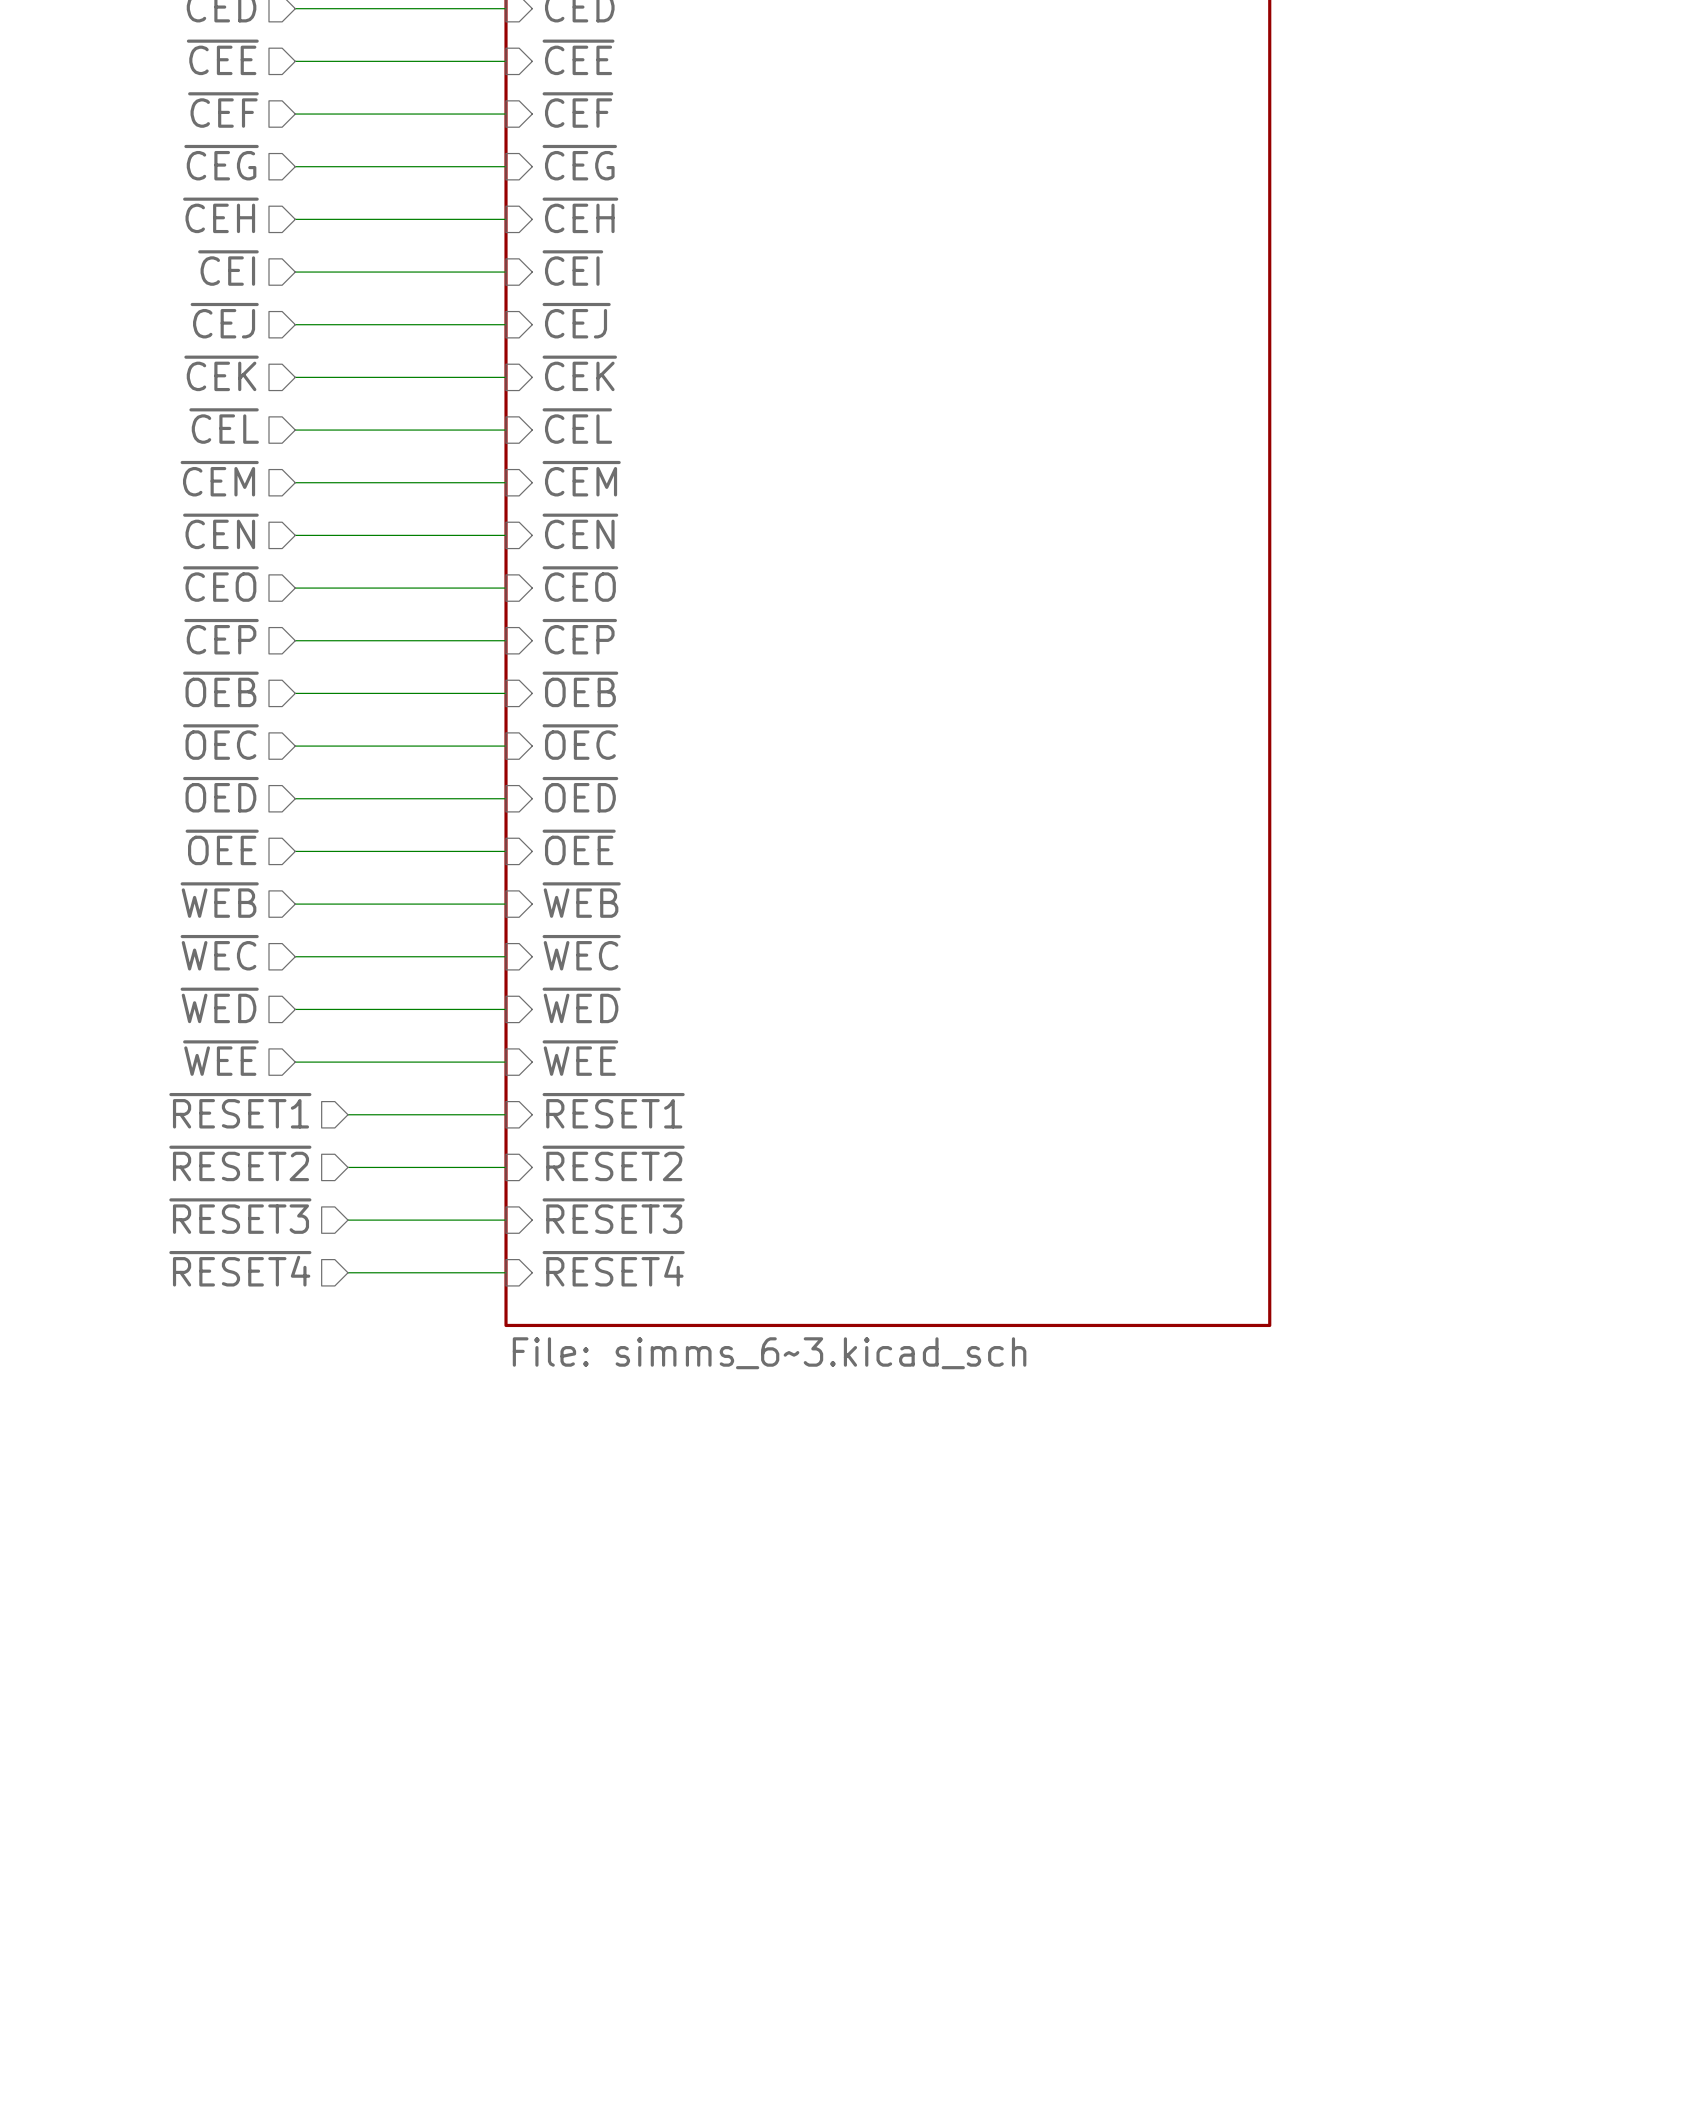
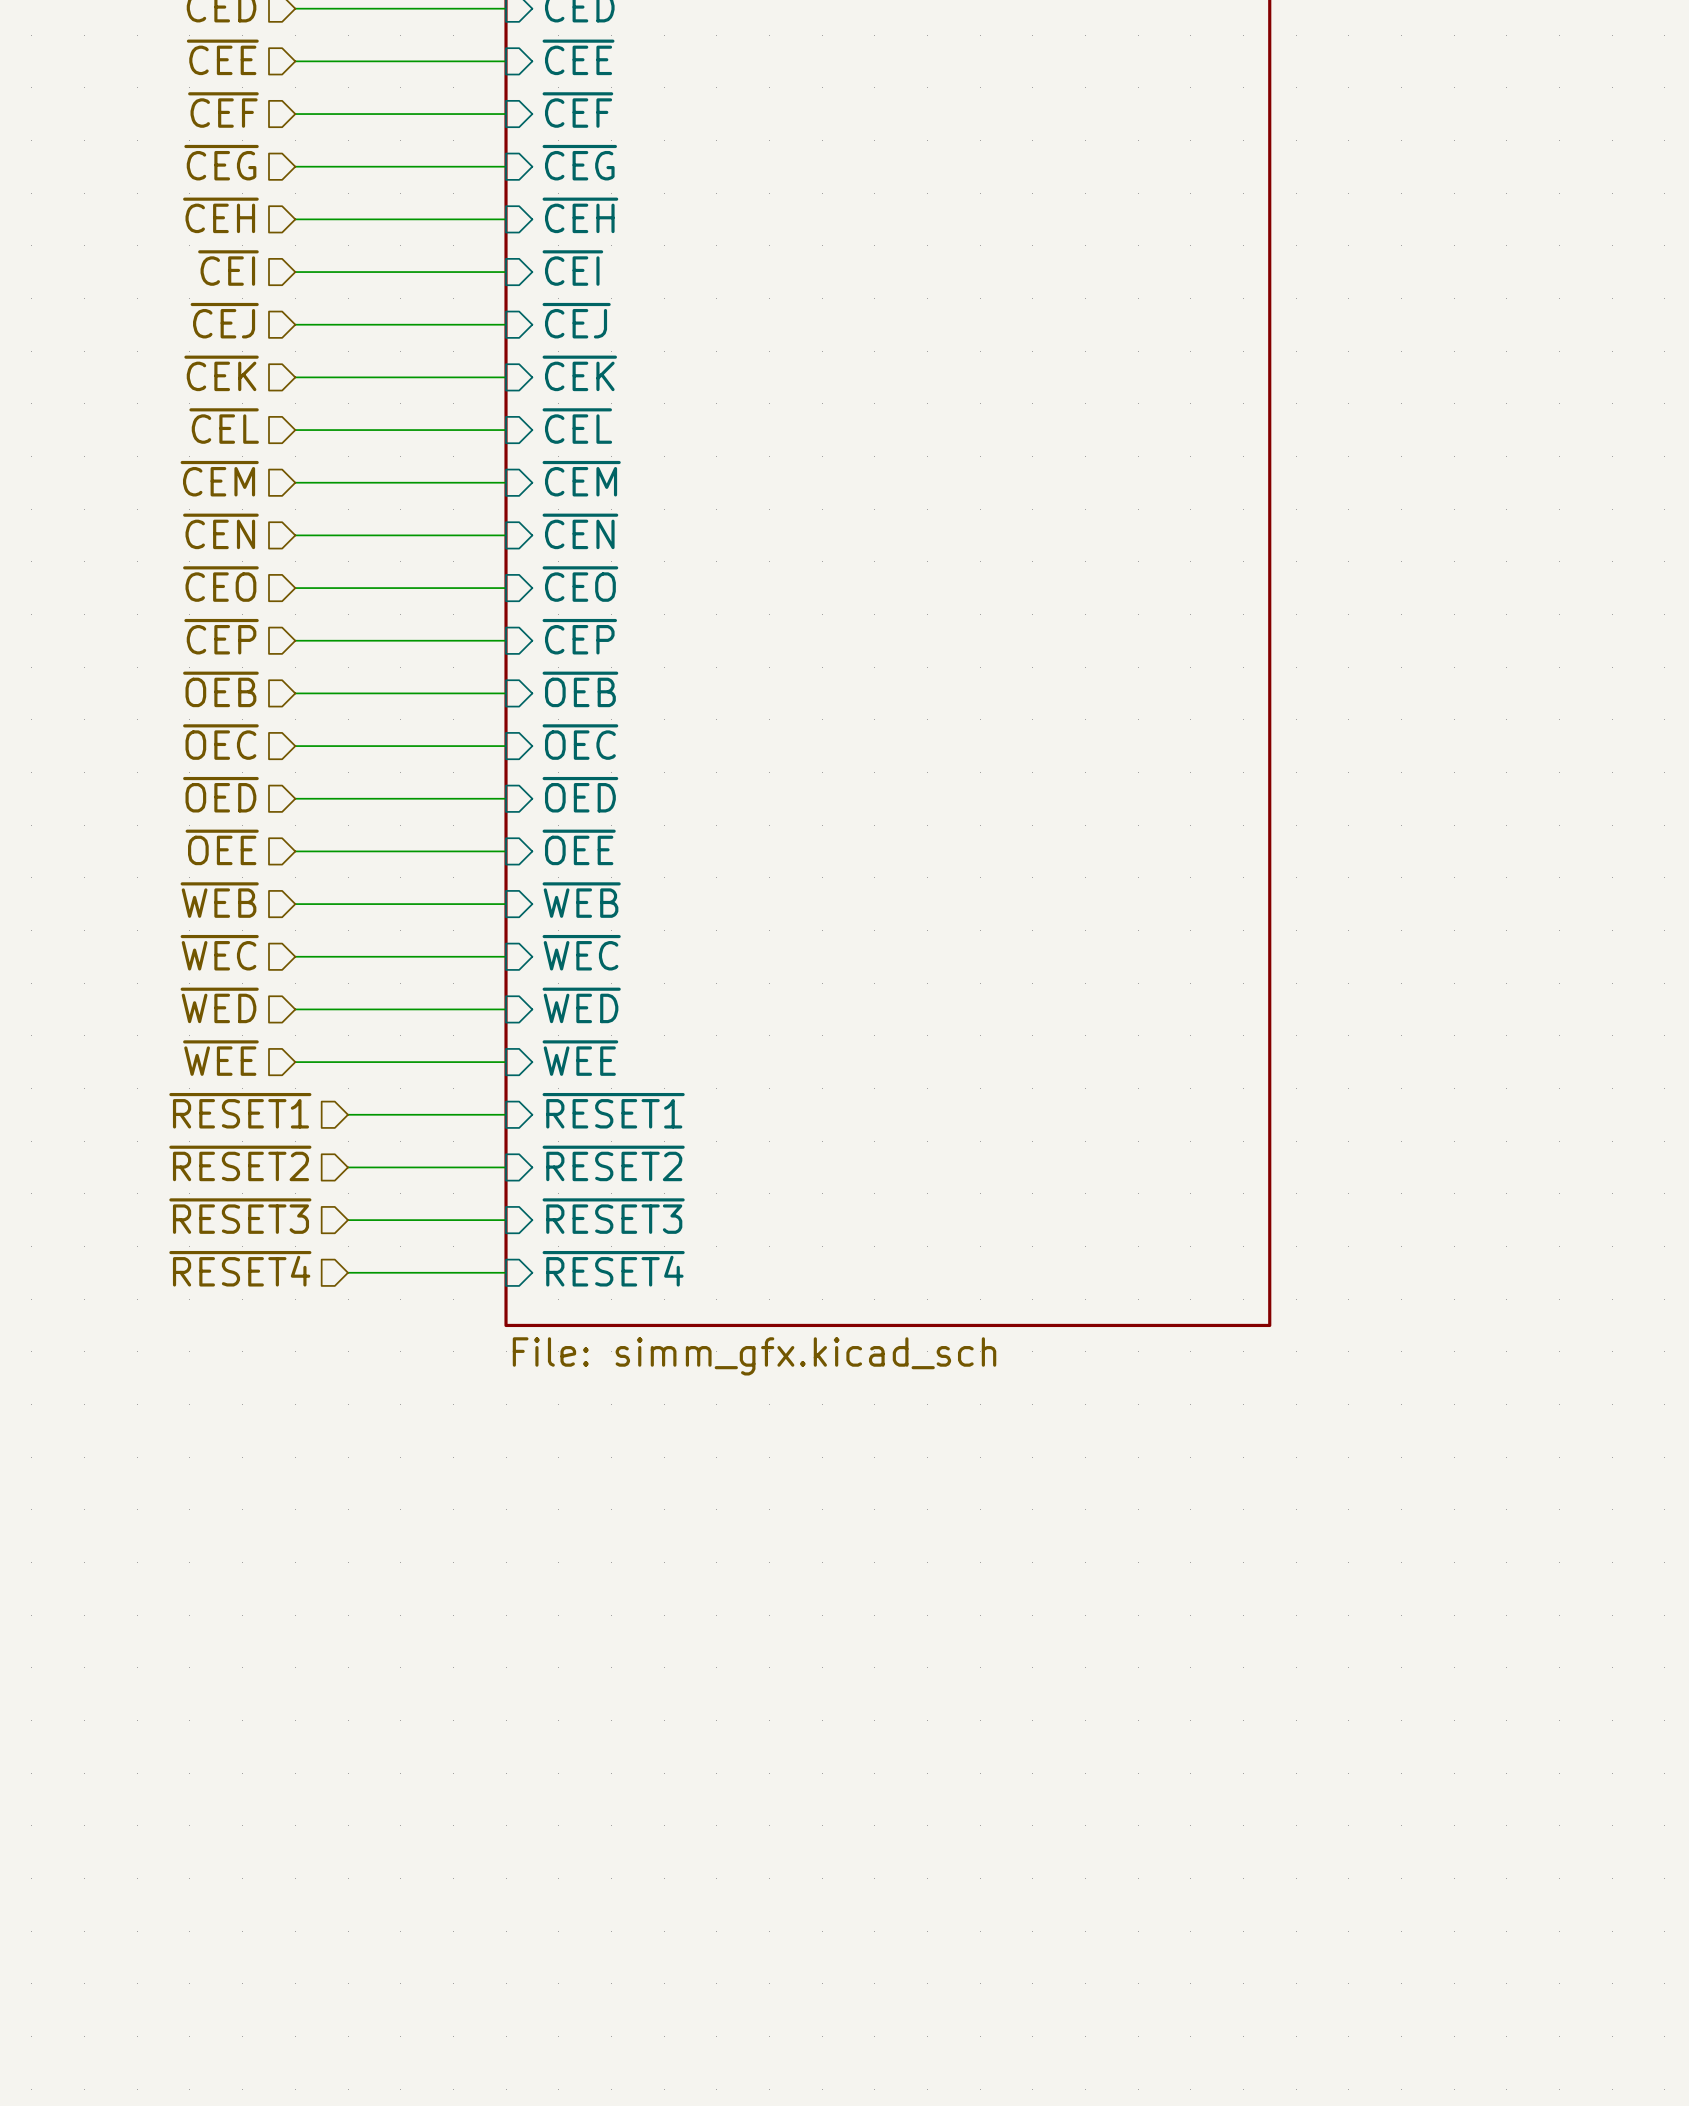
sheet value: File: simms_6~3.kicad_sch (769, 1353) -> File: simm_gfx.kicad_sch (754, 1356)

